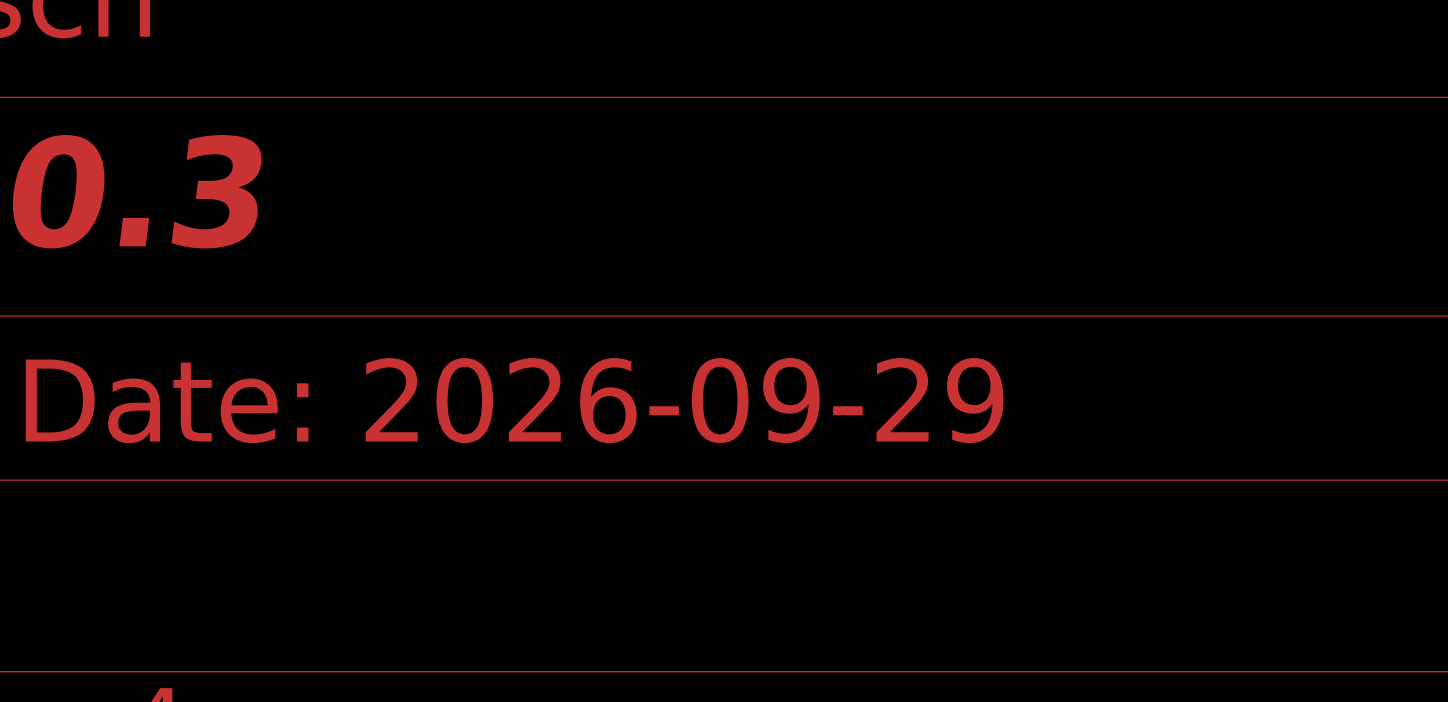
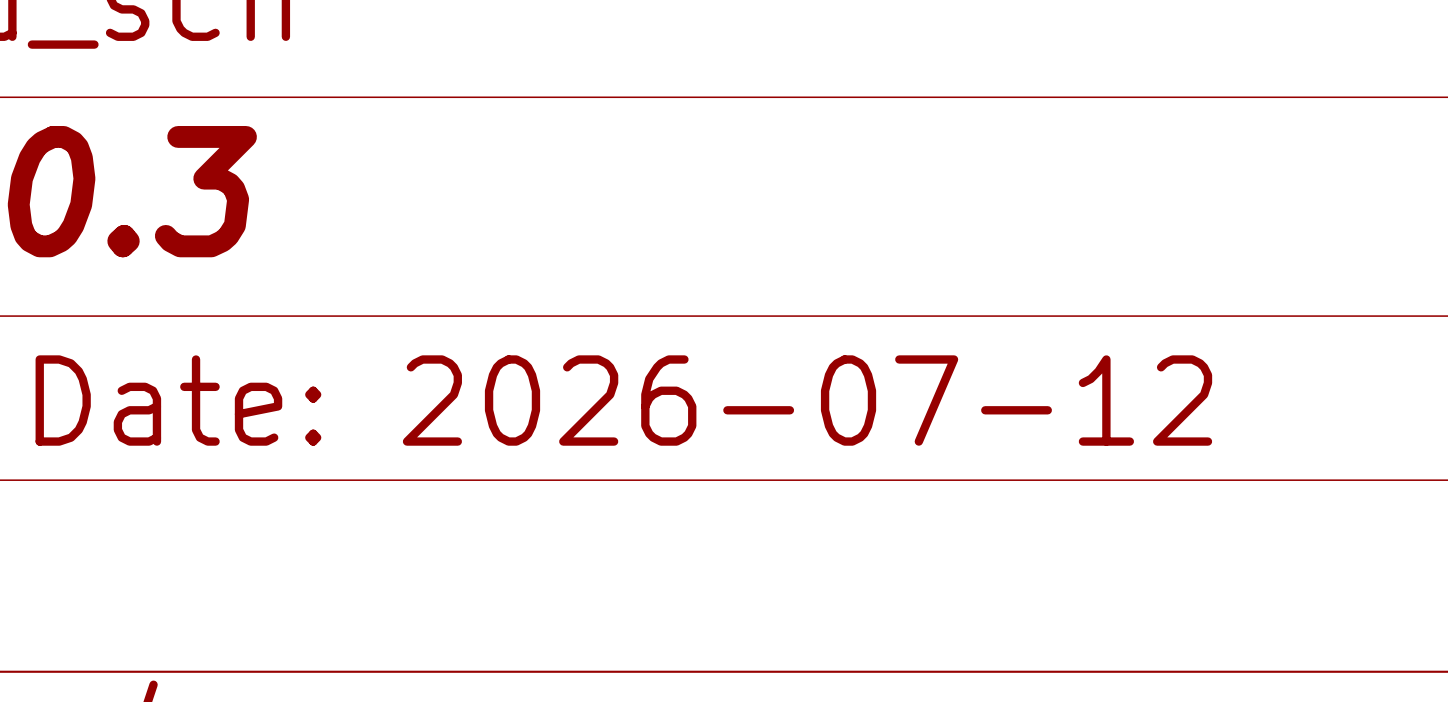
title block: Date: 2026-09-29 (514, 400) -> Date: 2026-07-12 (623, 400)

